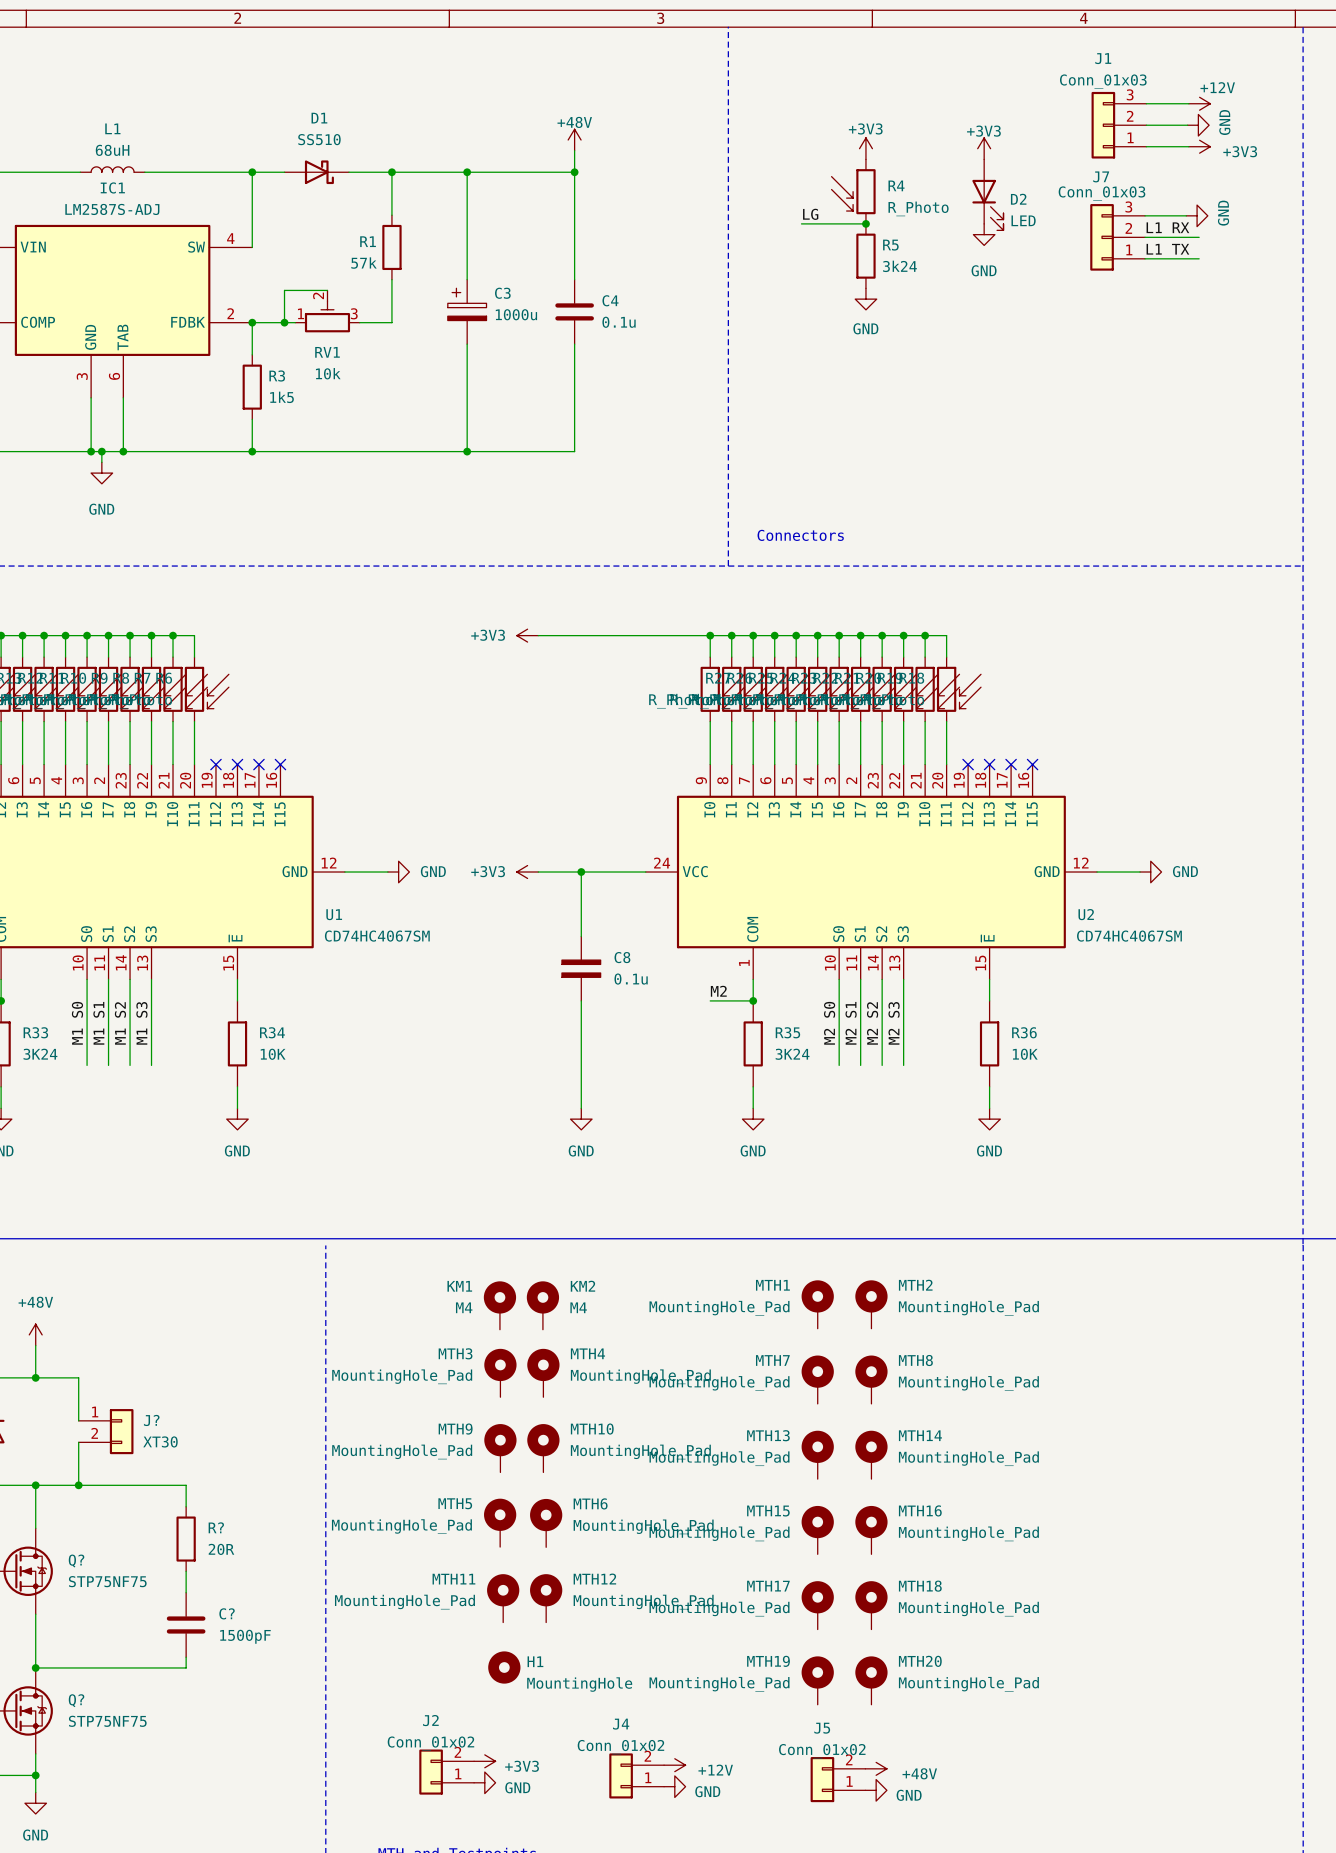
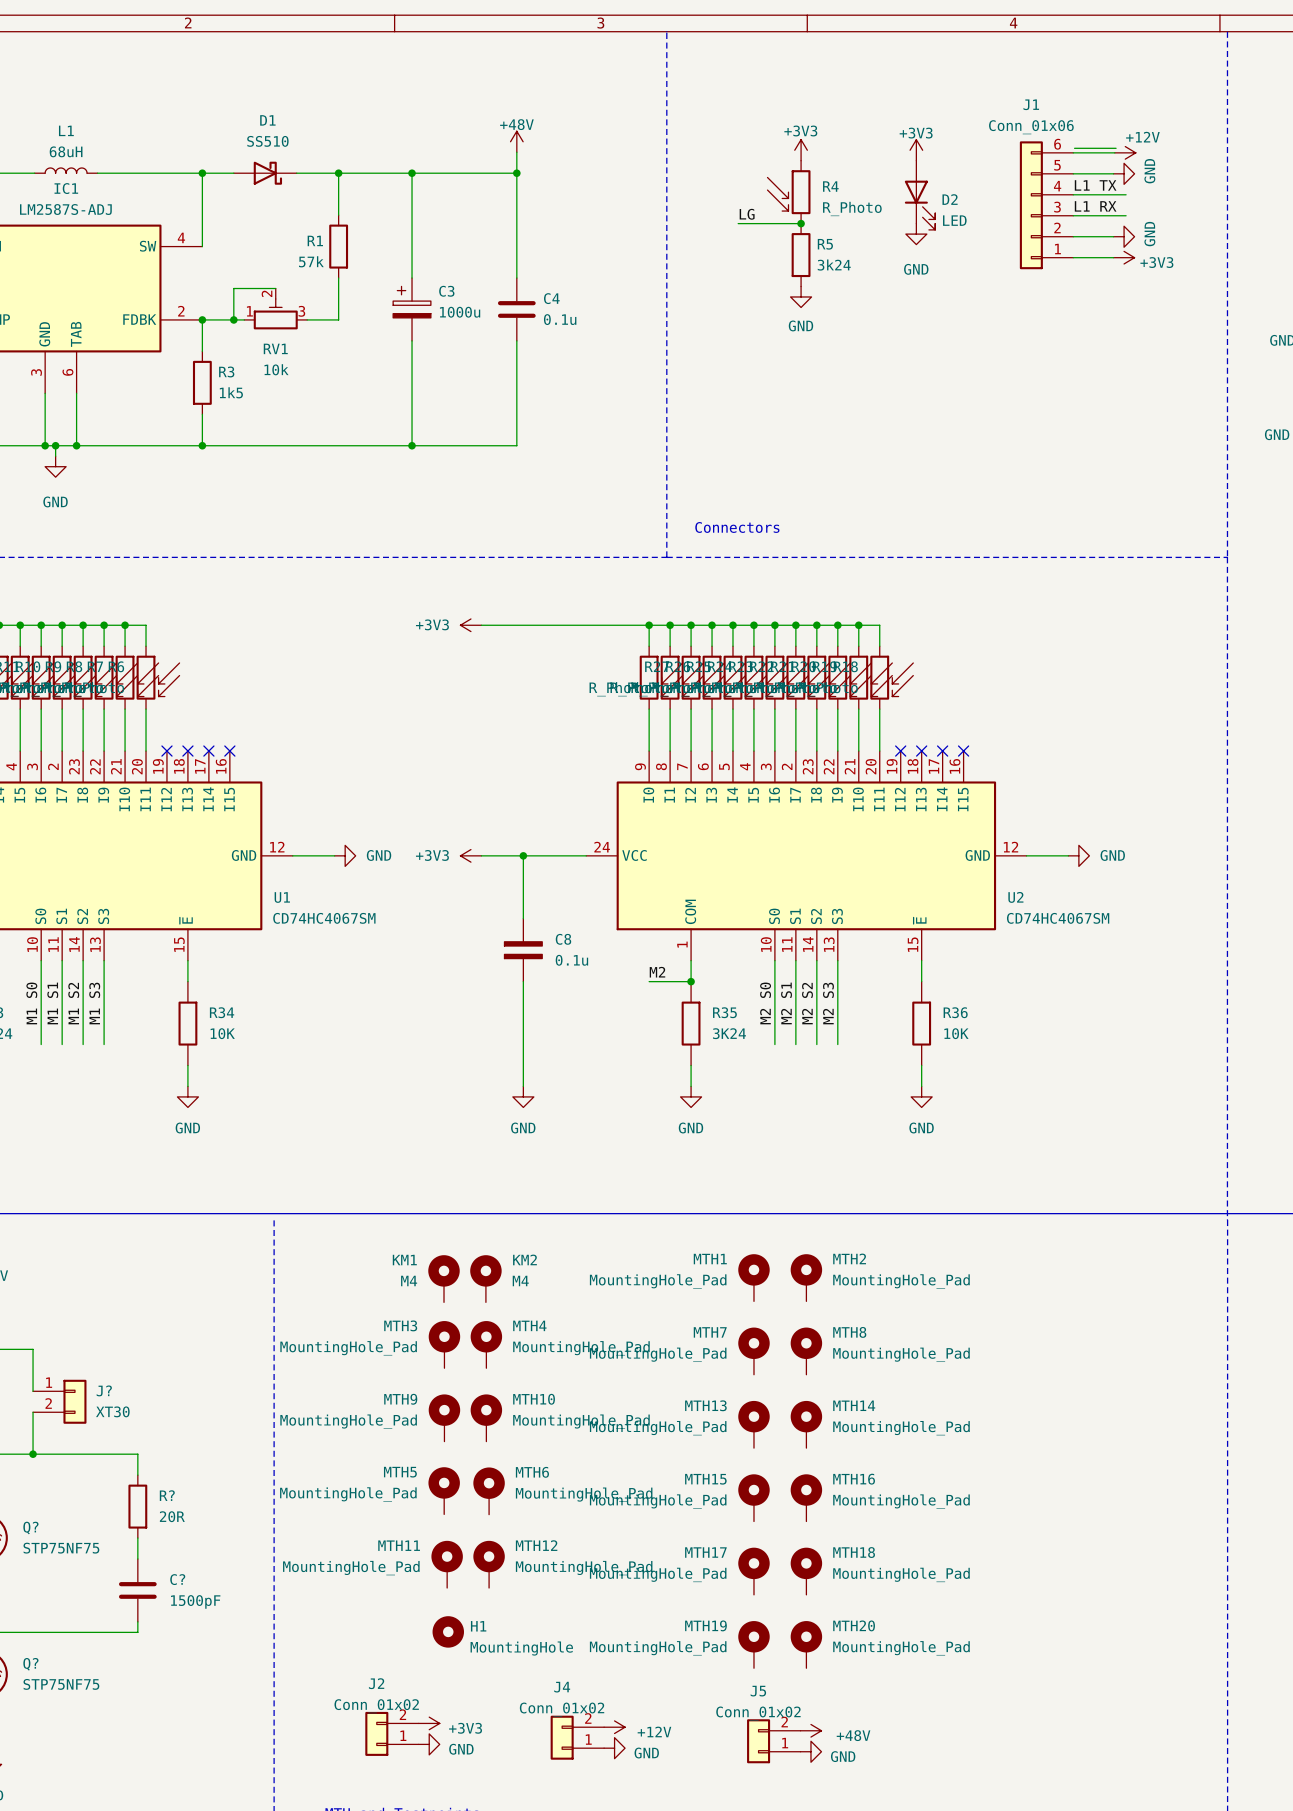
J1 name position: J1 (1103, 58) -> J1 (1031, 104)
J1 value: Conn_01x03 (1103, 81) -> Conn_01x06 (1031, 127)
J1 symbol: [1091, 91, 1147, 159] -> [1019, 141, 1074, 270]
wire: (1146, 103) (1188, 103) -> (1073, 152) (1114, 152)
power symbol: +12V (1199, 103) -> none
wire: (1146, 125) (1187, 125) -> (1073, 173) (1113, 173)
power symbol: GND (1198, 125) -> none
power symbol: +3V3 (1199, 146) -> +12V (1125, 152)
power symbol: none -> GND (1124, 173)
wire: none -> (1073, 194) (1126, 194)
power symbol: GND (1197, 215) -> none
label position: L1 RX (1167, 227) -> L1 RX (1095, 206)
J7: Conn_01x03 (1117, 237) -> none
power symbol: none -> GND (1124, 236)
label position: L1 TX (1167, 249) -> L1 TX (1095, 185)
power symbol: none -> +3V3 (1124, 257)

